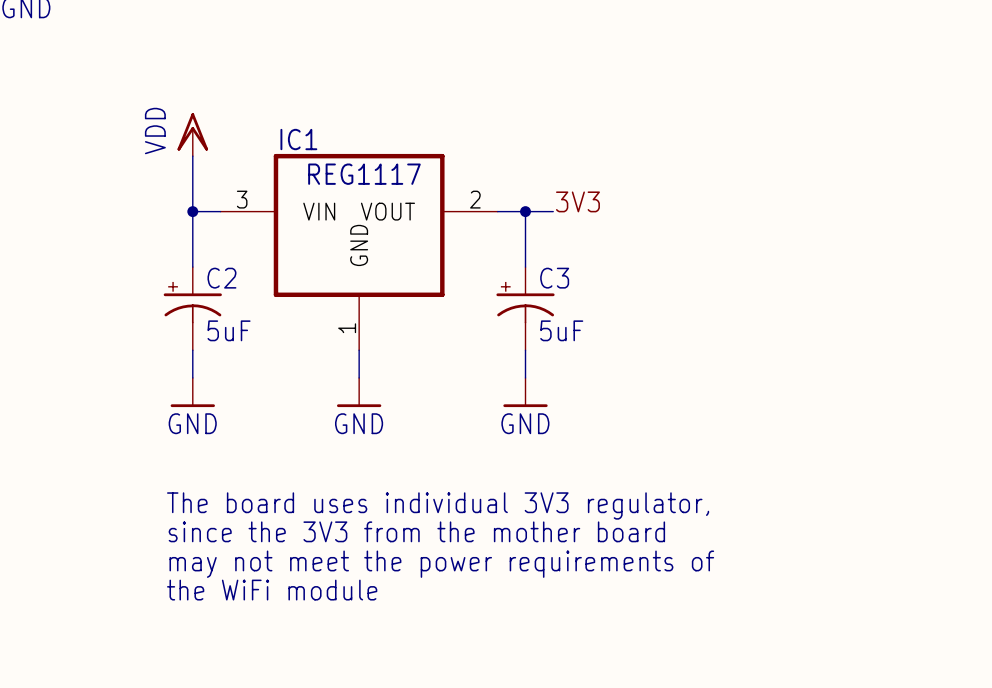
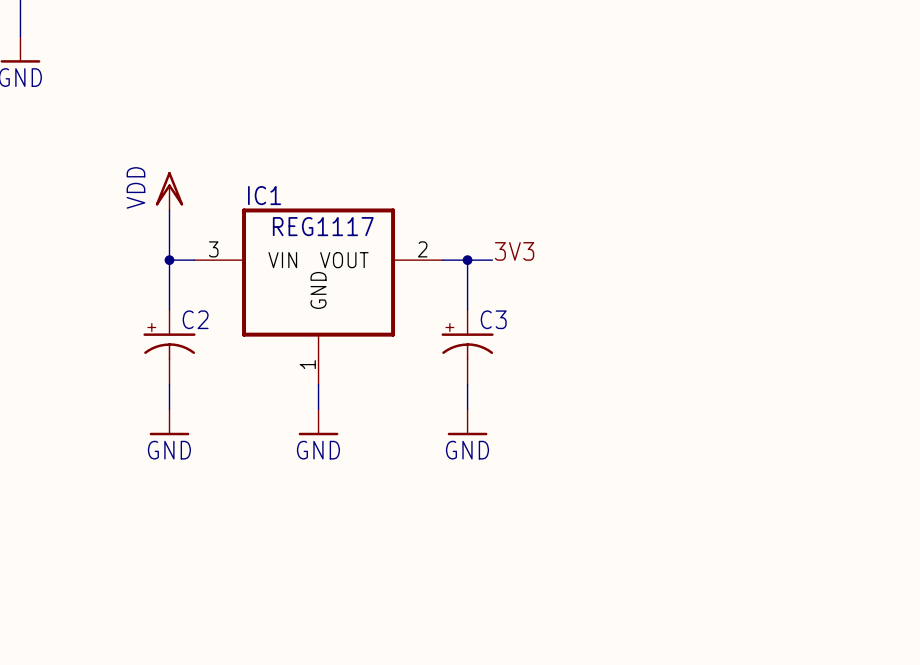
C2 value: 5uF (229, 330) -> none
C3 value: 5uF (561, 330) -> none
text: The board uses individual 3V3 regulator, (438, 505) -> none
text: since the 3V3 from the mother board (416, 531) -> none
text: may not meet the power requirements of (441, 564) -> none
text: the WiFi module (272, 590) -> none

